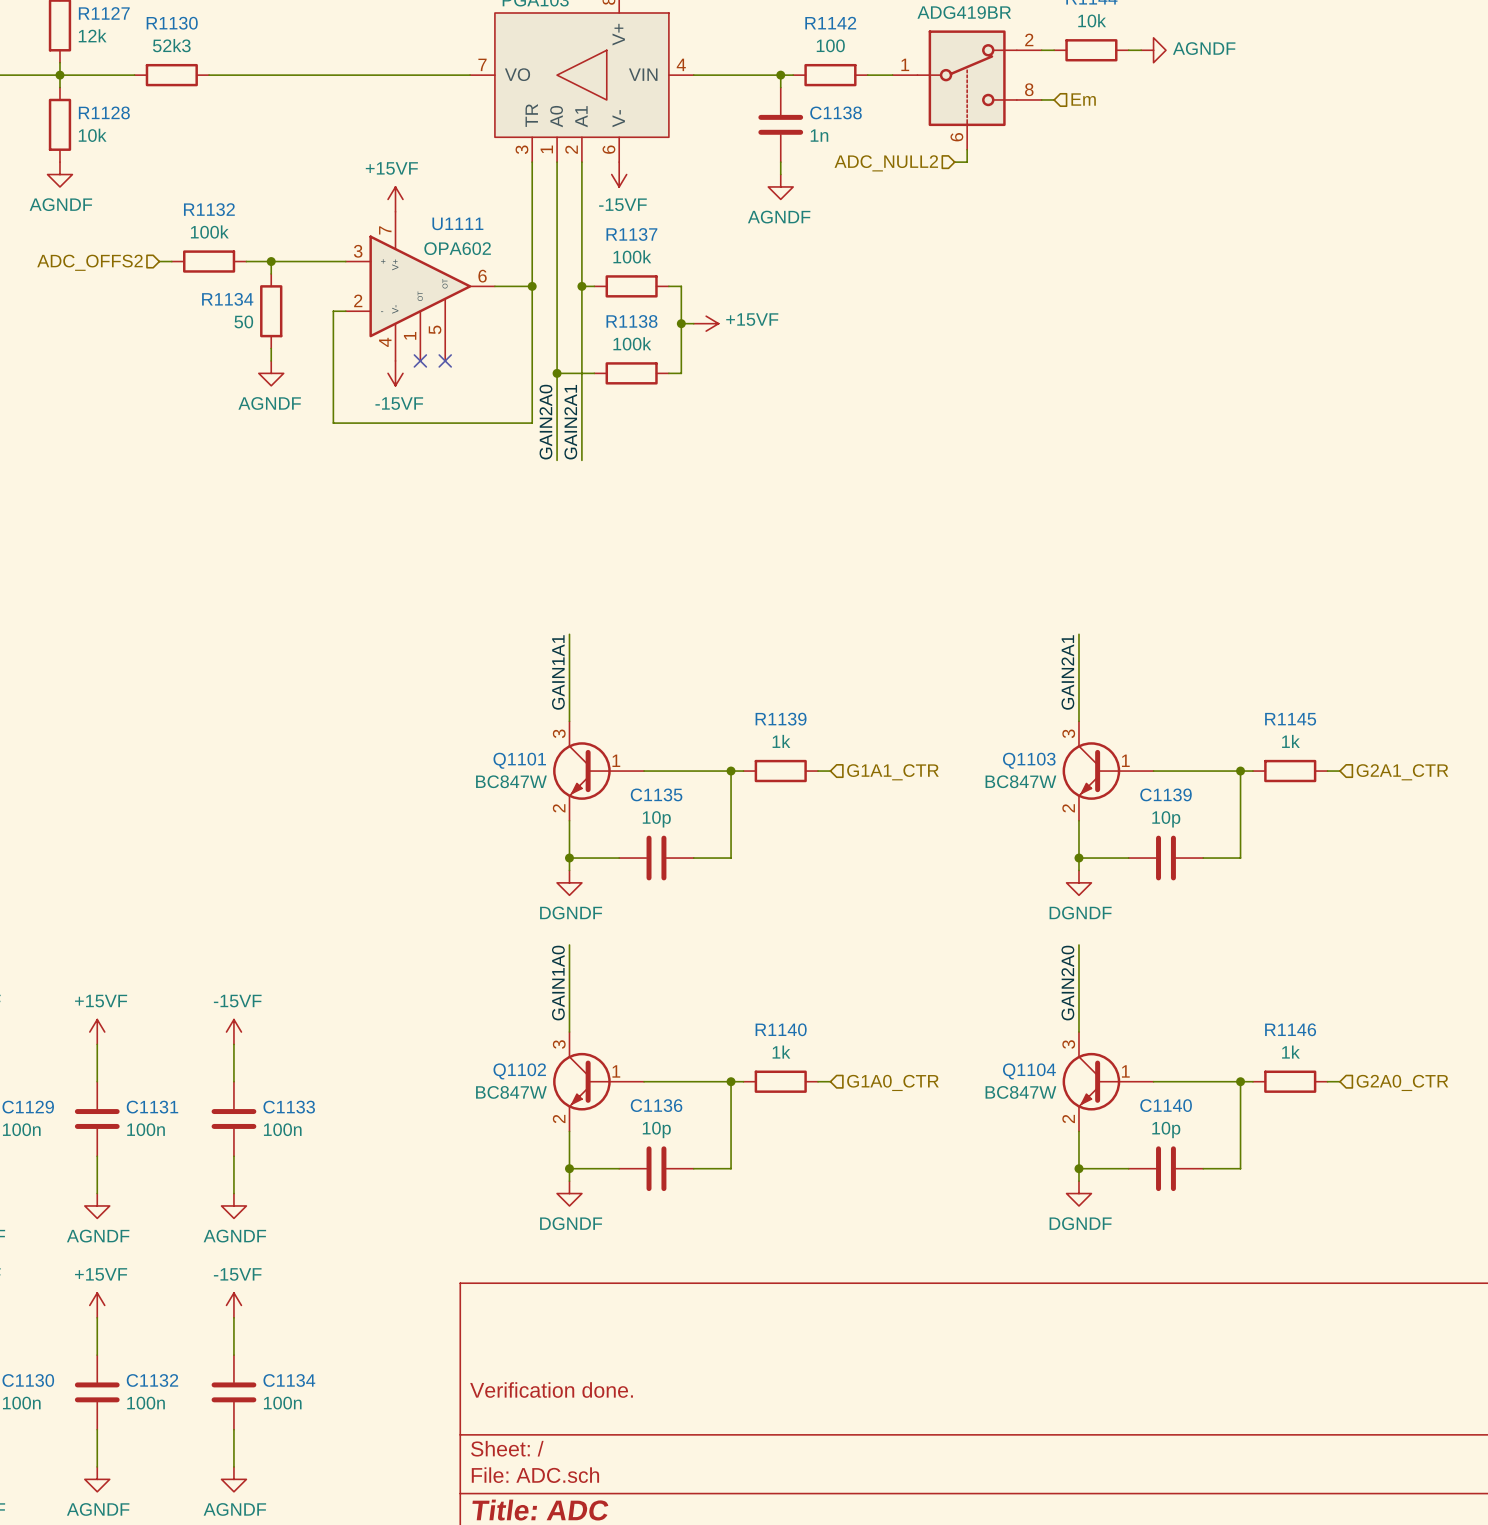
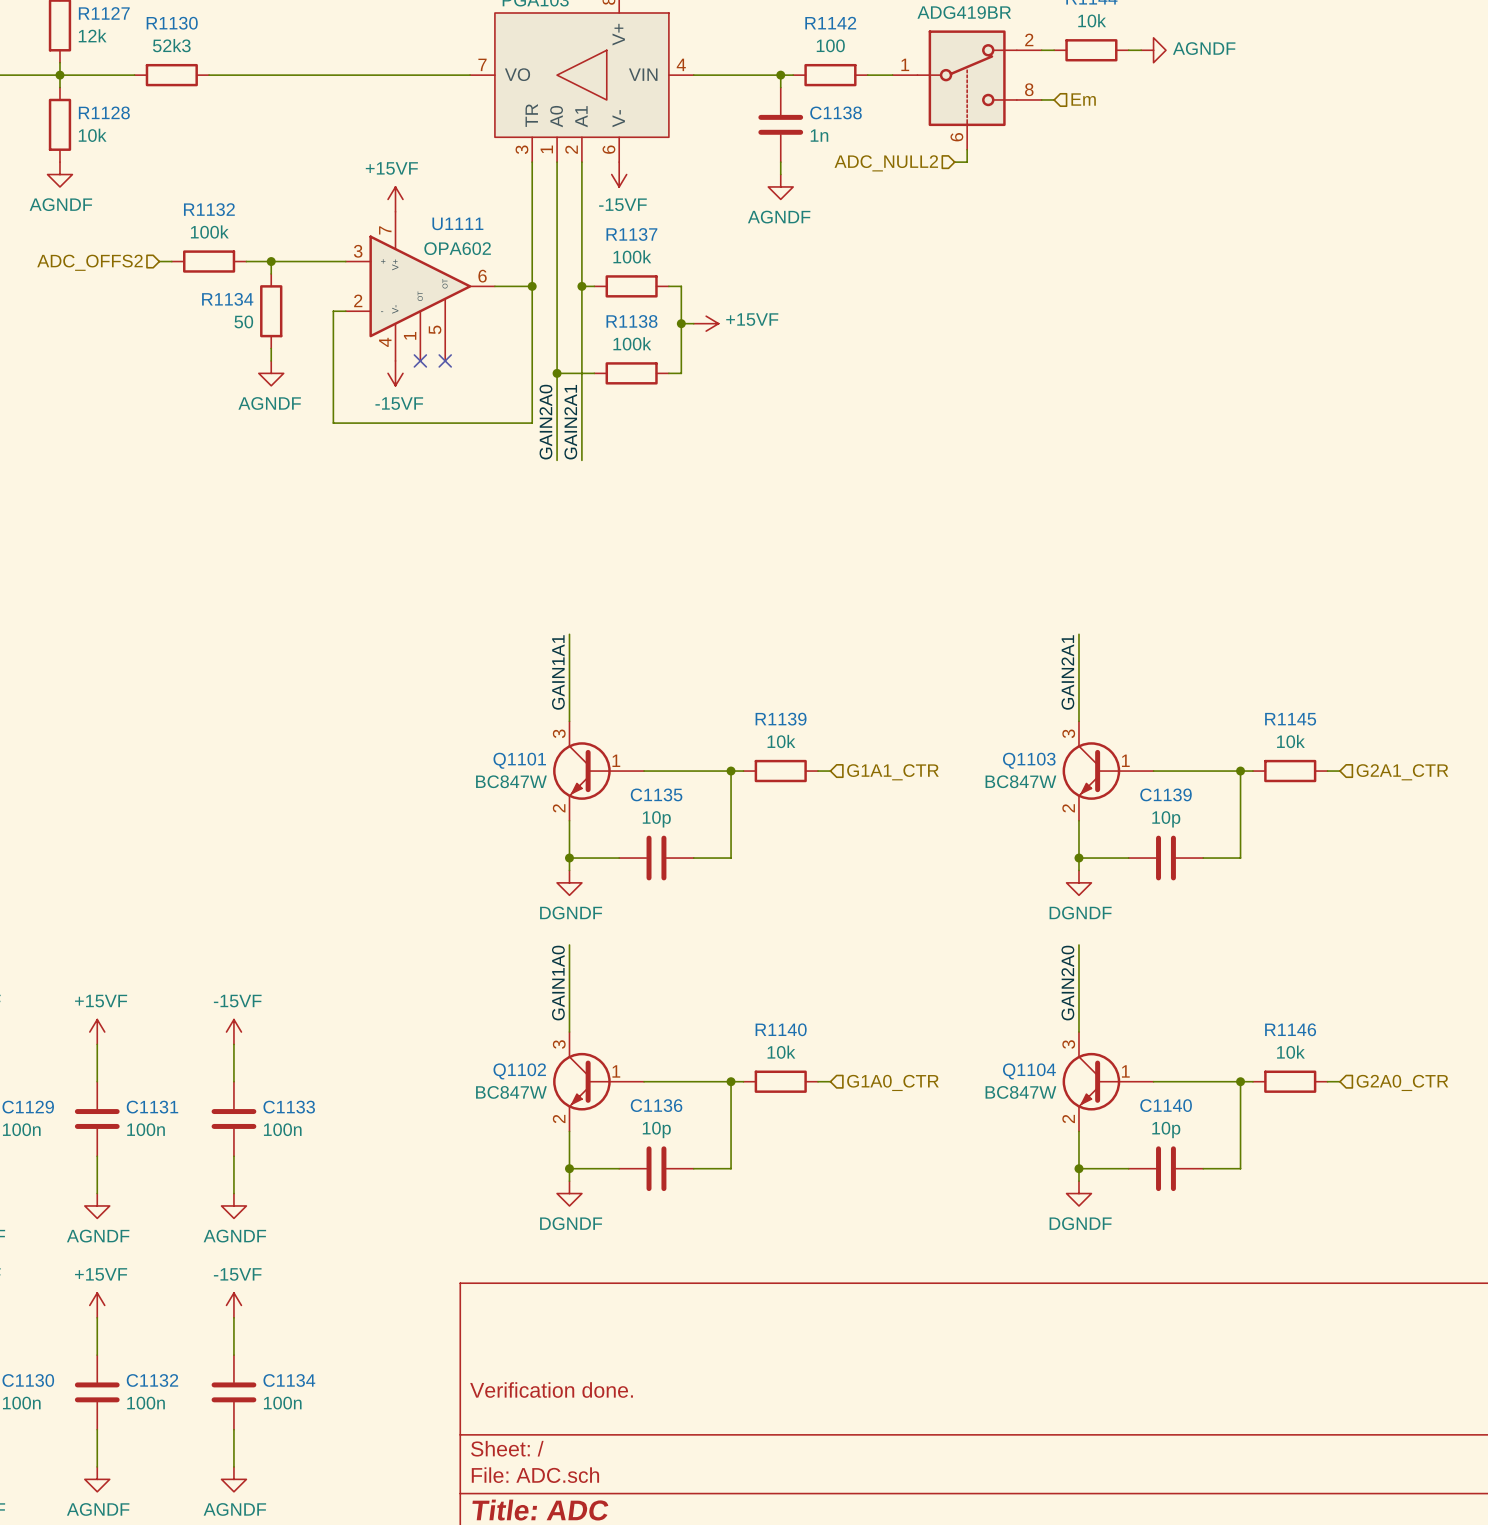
R1139 value: 1k (781, 741) -> 10k (781, 741)
R1145 value: 1k (1290, 741) -> 10k (1290, 741)
R1140 value: 1k (781, 1052) -> 10k (781, 1052)
R1146 value: 1k (1290, 1052) -> 10k (1290, 1052)

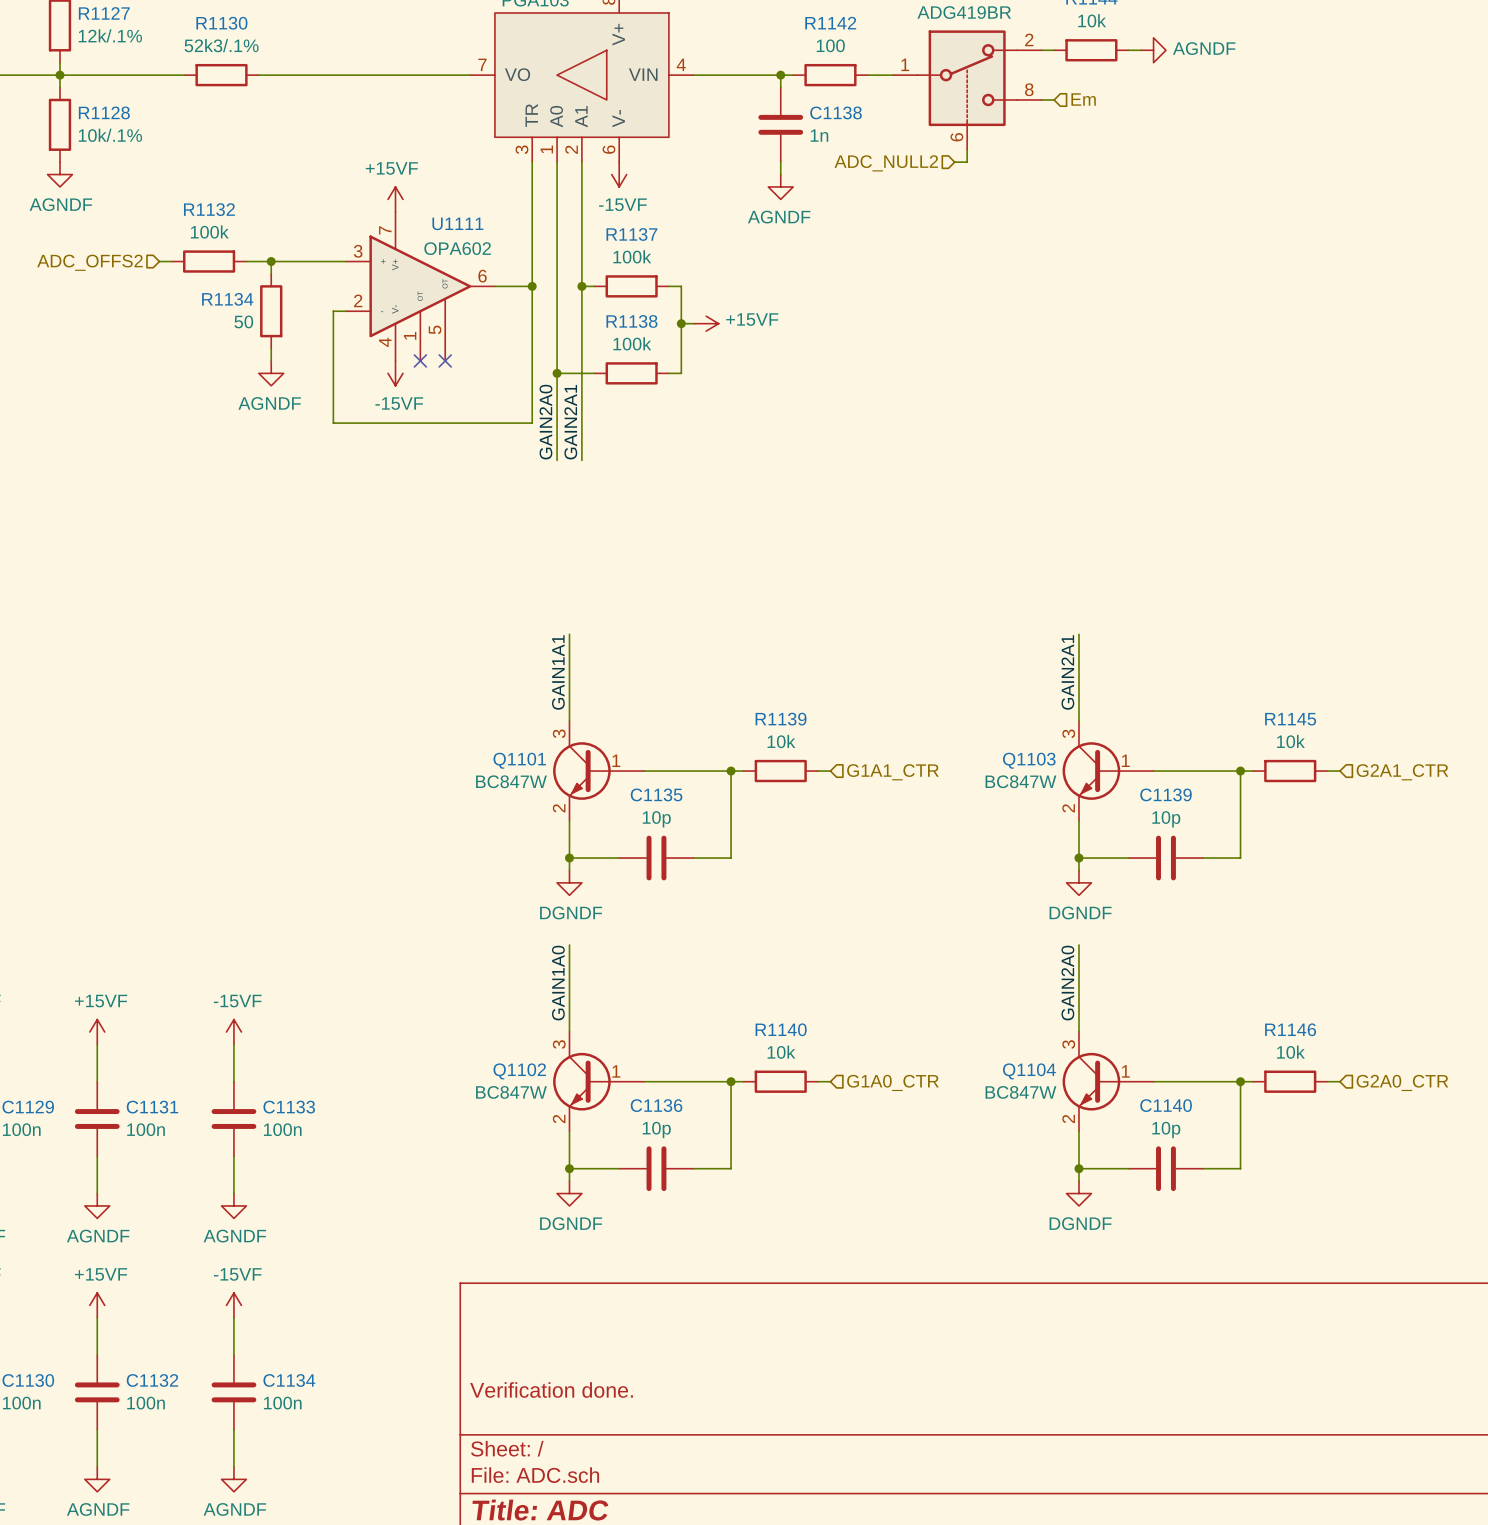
R1127 value: 12k (92, 35) -> 12k/.1% (110, 35)
R1130 value: 52k3 (171, 45) -> 52k3/.1% (221, 45)
R1130 position: (171, 75) -> (221, 75)
wire: (209, 75) (258, 75) -> (134, 75) (184, 75)
R1128 value: 10k (92, 135) -> 10k/.1% (110, 135)

